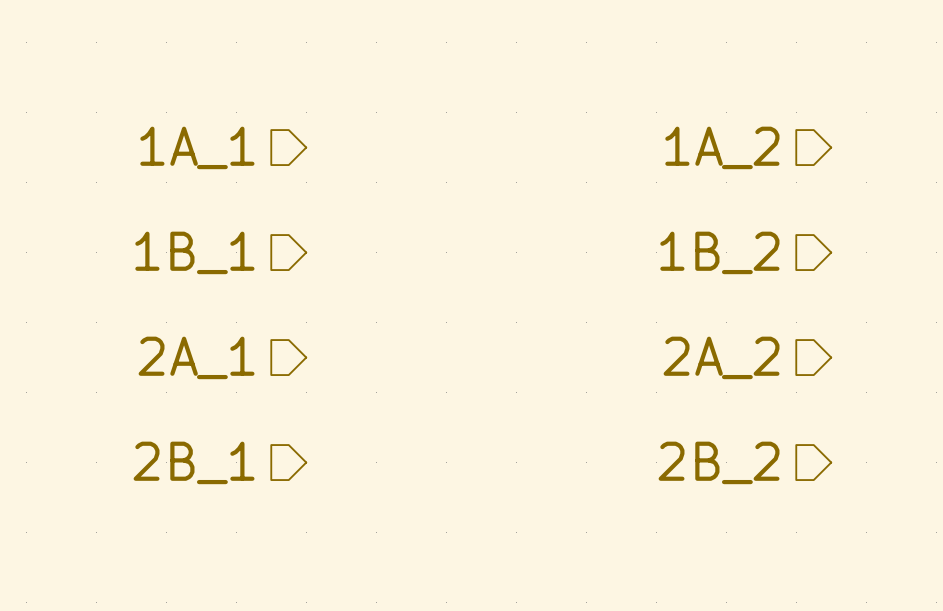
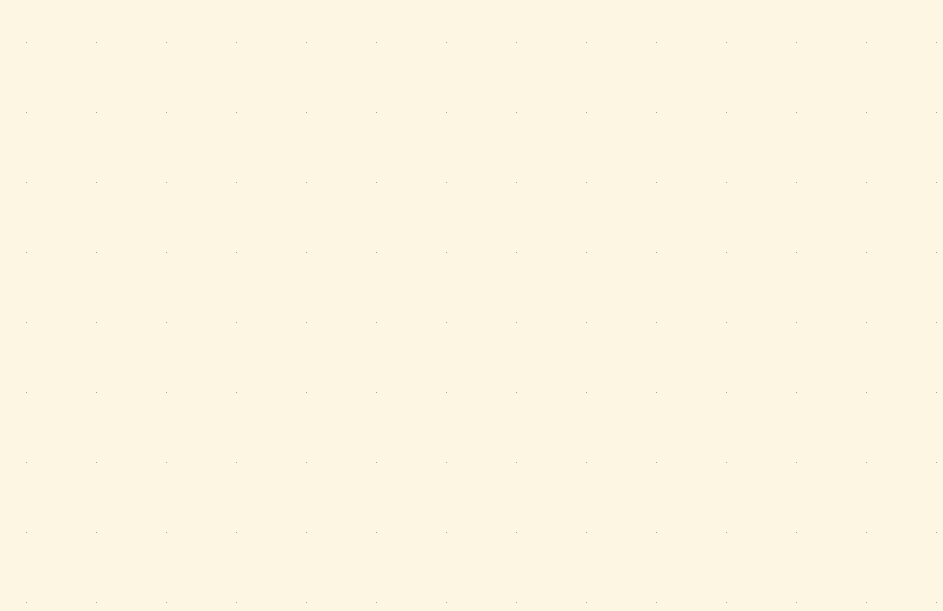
hierarchical label: 1A_1 (197, 147) -> none
hierarchical label: 1A_2 (722, 147) -> none
hierarchical label: 1B_1 (194, 252) -> none
hierarchical label: 1B_2 (719, 252) -> none
hierarchical label: 2A_1 (196, 357) -> none
hierarchical label: 2A_2 (721, 357) -> none
hierarchical label: 2B_1 (194, 462) -> none
hierarchical label: 2B_2 (719, 462) -> none

